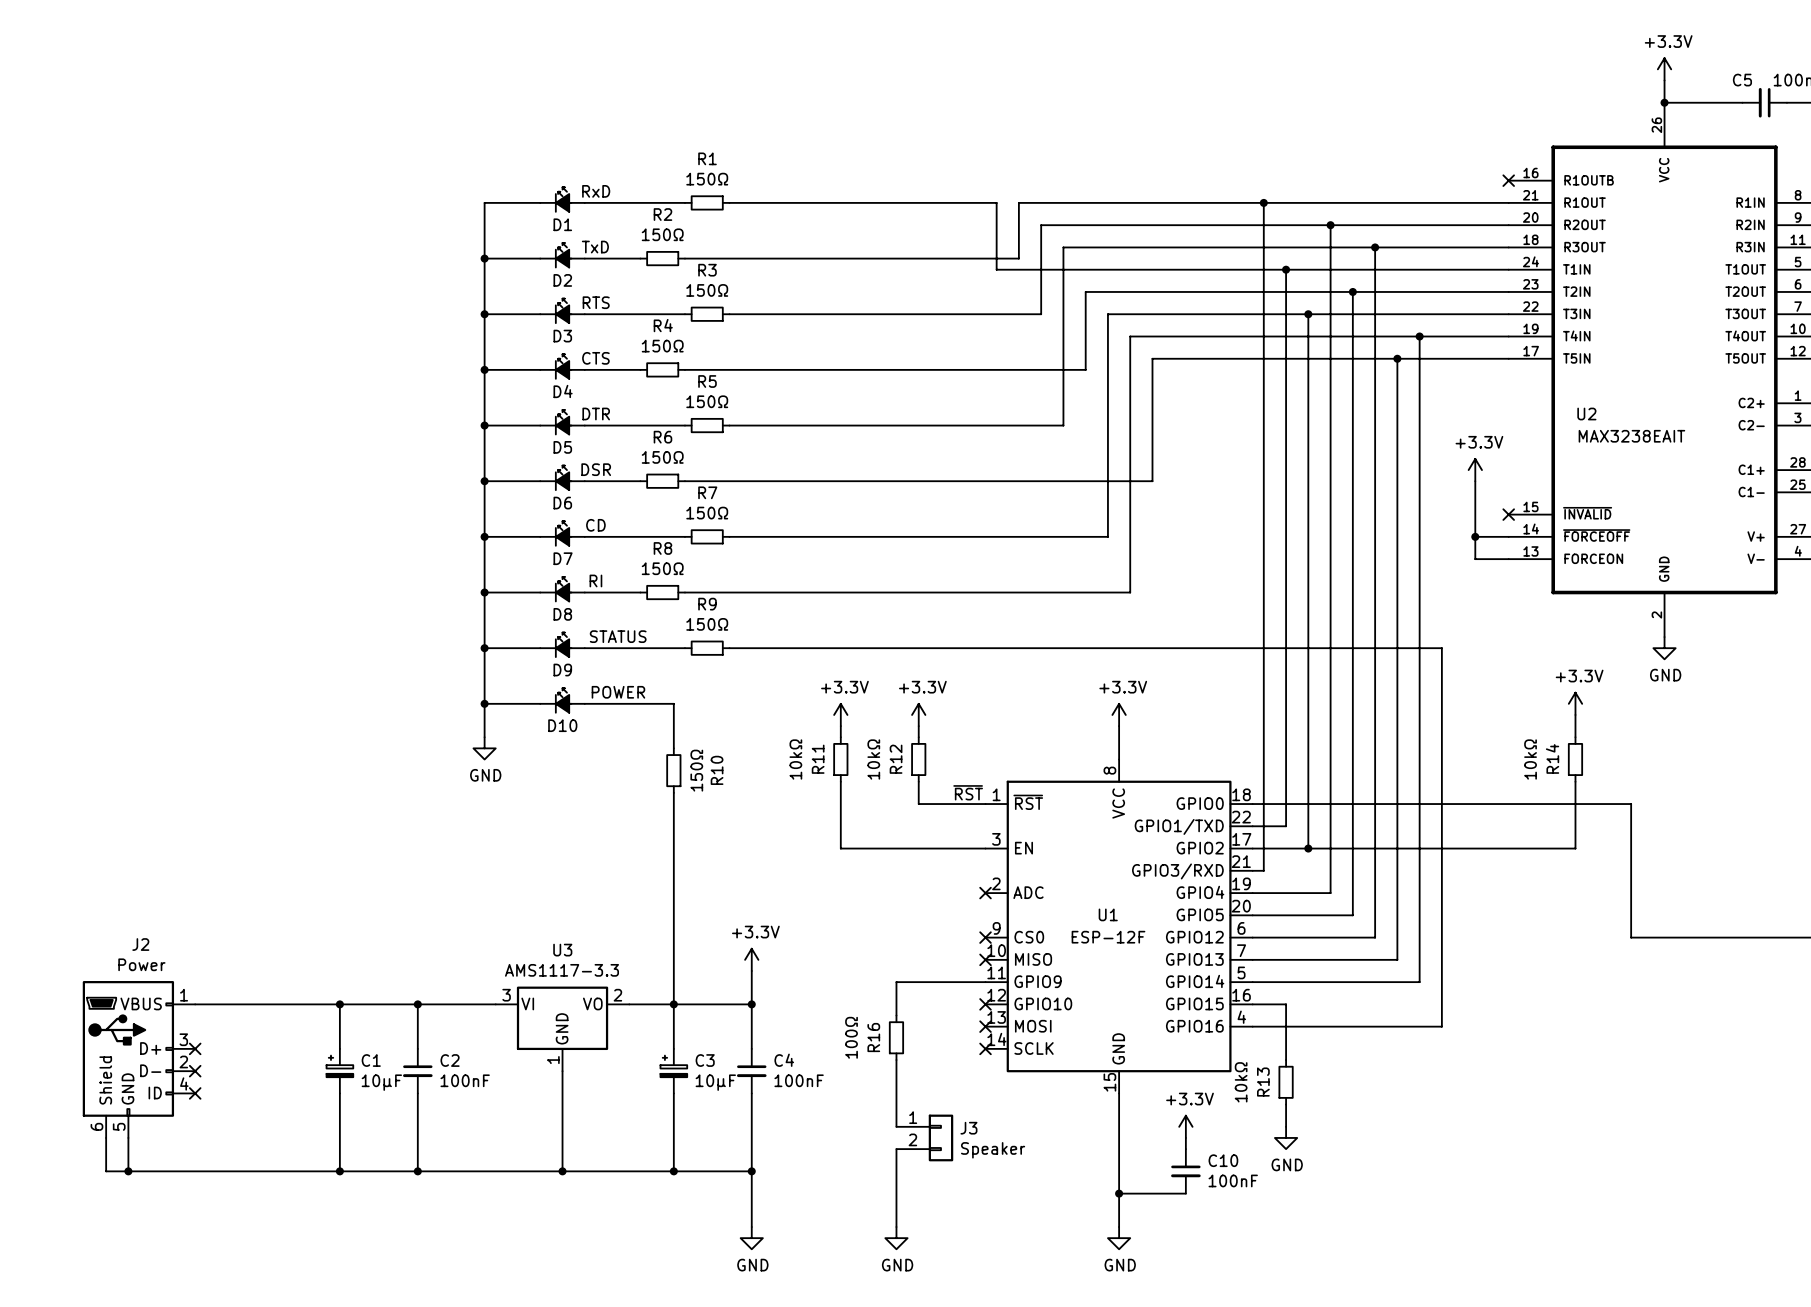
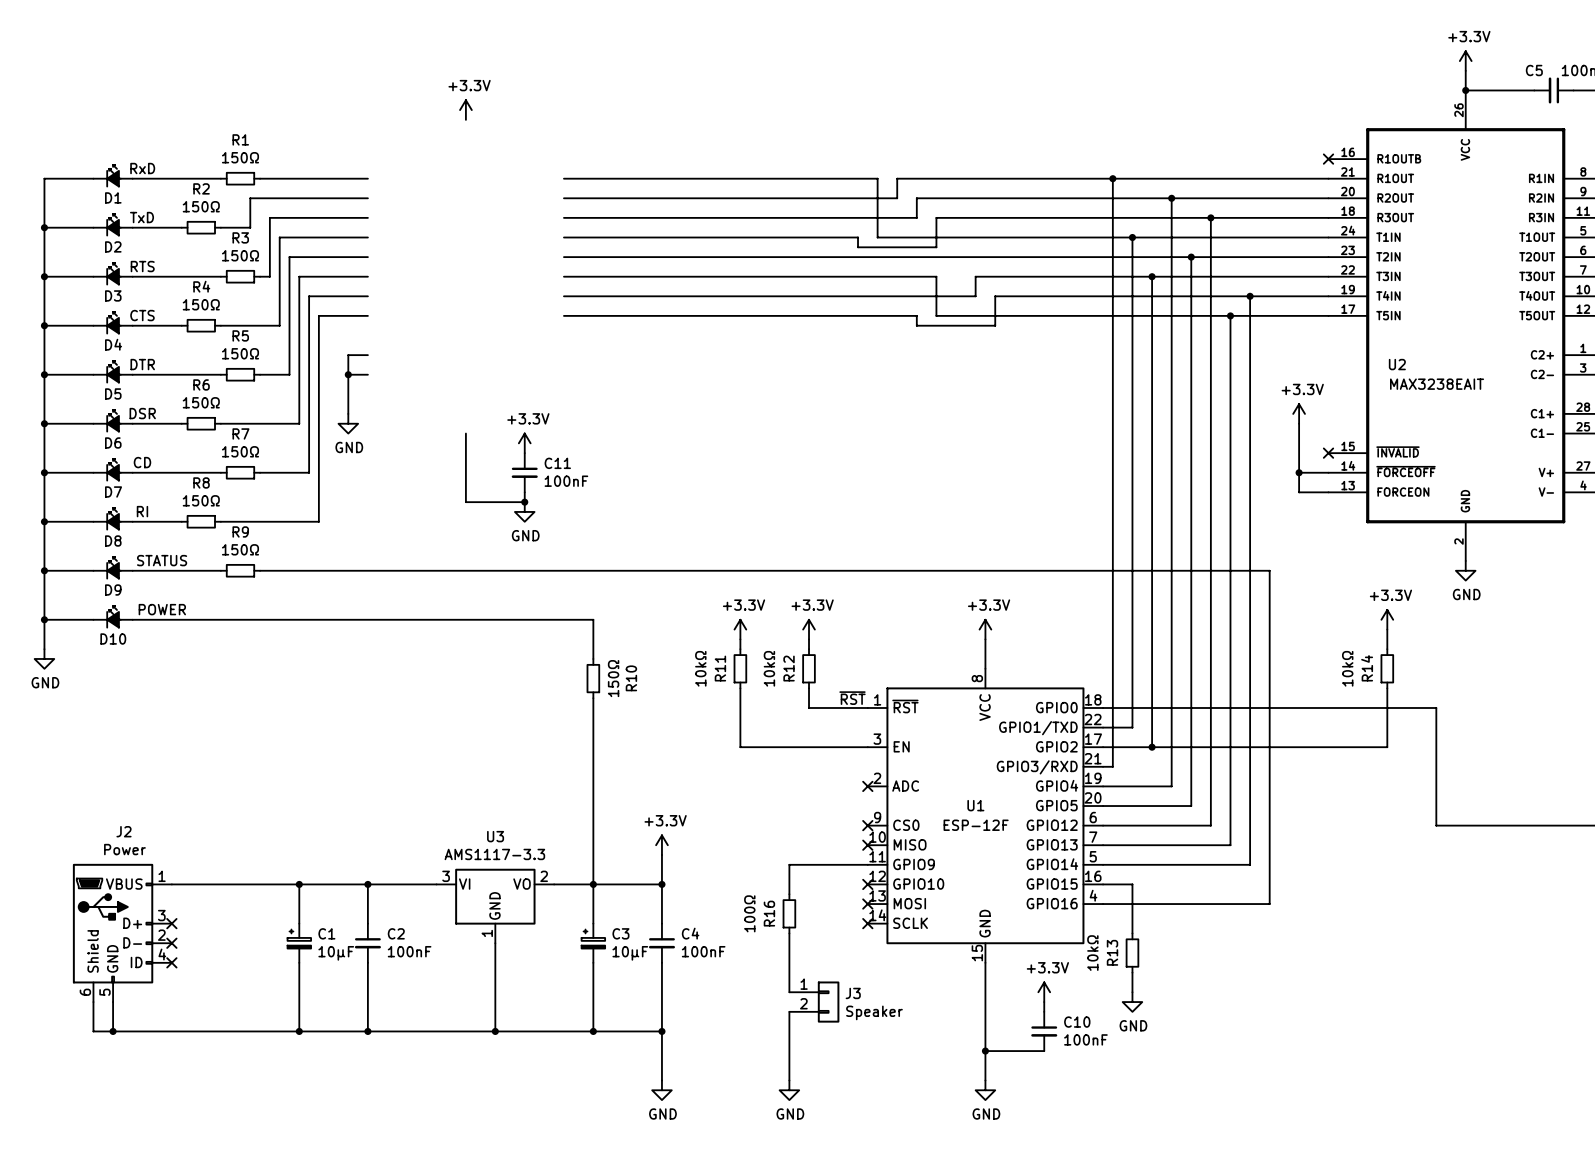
power symbol: none -> +3.3V (465, 110)
D1 position: (562, 199) -> (113, 175)
wire: none -> (93, 178) (44, 178) (44, 649)
wire: none -> (132, 178) (220, 178)
wire: none -> (260, 178) (367, 178)
wire: (540, 202) (484, 202) (484, 737) -> none
wire: (584, 202) (640, 202) -> none
wire: none -> (603, 178) (642, 178)
R1 position: (707, 202) -> (240, 178)
wire: none -> (367, 198) (250, 198) (250, 227) (220, 227)
wire: (1018, 225) (1018, 258) (684, 258) -> (897, 198) (563, 198)
wire: none -> (367, 217) (269, 217) (269, 276) (260, 276)
wire: (1041, 247) (1041, 314) -> (916, 217) (563, 217)
D2 position: (562, 255) -> (113, 224)
wire: none -> (44, 227) (93, 227)
junction: none -> (44, 227)
wire: none -> (132, 227) (181, 227)
wire: (484, 258) (540, 258) -> none
junction: (484, 258) -> none
wire: (584, 258) (640, 258) -> none
R2 position: (662, 258) -> (201, 227)
wire: none -> (367, 237) (279, 237) (279, 325) (220, 325)
wire: none -> (563, 237) (858, 237) (858, 247) (936, 247)
wire: (1063, 280) (1063, 314) -> (916, 276) (936, 276)
wire: none -> (367, 257) (289, 257) (289, 374) (260, 374)
wire: none -> (563, 257) (956, 257)
wire: (1085, 291) (1085, 369) -> (995, 325) (956, 325)
D3 position: (562, 310) -> (113, 273)
wire: none -> (44, 276) (93, 276)
junction: none -> (44, 276)
wire: none -> (132, 276) (220, 276)
wire: none -> (367, 276) (299, 276) (299, 423) (220, 423)
wire: (484, 314) (540, 314) -> none
junction: (484, 314) -> none
wire: (584, 314) (640, 314) -> none
wire: none -> (603, 276) (642, 276)
R3 position: (707, 314) -> (240, 276)
wire: none -> (367, 296) (309, 296) (309, 472) (260, 472)
wire: (1107, 336) (1107, 536) (729, 536) -> (975, 296) (563, 296)
wire: none -> (367, 315) (318, 315) (318, 521) (220, 521)
wire: (1063, 358) (1063, 425) (729, 425) -> none
wire: (1152, 358) (1152, 481) (684, 481) -> (1014, 315) (936, 315)
D4 position: (562, 366) -> (113, 322)
wire: none -> (44, 325) (93, 325)
junction: none -> (44, 325)
wire: none -> (132, 325) (181, 325)
wire: (484, 369) (540, 369) -> none
junction: (484, 369) -> none
wire: (584, 369) (640, 369) -> none
R4 position: (662, 369) -> (201, 325)
wire: (684, 369) (1041, 369) -> (563, 315) (916, 315) (916, 325)
wire: (1130, 369) (1130, 592) (684, 592) -> none
wire: none -> (367, 355) (348, 355) (348, 413)
D5 position: (562, 422) -> (113, 371)
wire: none -> (44, 374) (93, 374)
junction: none -> (44, 374)
wire: none -> (132, 374) (220, 374)
wire: none -> (348, 374) (367, 374)
junction: none -> (348, 374)
wire: (484, 425) (540, 425) -> none
junction: (484, 425) -> none
wire: (584, 425) (684, 425) -> none
R5 position: (707, 425) -> (240, 374)
D6 position: (562, 477) -> (113, 420)
wire: none -> (44, 423) (93, 423)
junction: none -> (44, 423)
wire: none -> (132, 423) (181, 423)
power symbol: none -> GND (348, 423)
wire: (484, 481) (540, 481) -> none
junction: (484, 481) -> none
wire: (584, 481) (640, 481) -> none
R6 position: (662, 481) -> (201, 423)
wire: none -> (465, 433) (465, 502) (524, 502) (524, 492)
power symbol: none -> +3.3V (524, 443)
D7 position: (562, 533) -> (113, 469)
wire: none -> (44, 472) (93, 472)
junction: none -> (44, 472)
wire: none -> (132, 472) (220, 472)
wire: (484, 536) (540, 536) -> none
junction: (484, 536) -> none
wire: (584, 536) (684, 536) -> none
C11: none -> 100nF (524, 472)
R7 position: (707, 536) -> (240, 472)
junction: none -> (524, 502)
power symbol: none -> GND (524, 511)
D8 position: (562, 589) -> (113, 518)
wire: none -> (44, 521) (93, 521)
junction: none -> (44, 521)
wire: none -> (132, 521) (181, 521)
wire: (484, 592) (540, 592) -> none
junction: (484, 592) -> none
wire: (584, 592) (640, 592) -> none
R8 position: (662, 592) -> (201, 521)
D9 position: (562, 644) -> (113, 567)
wire: none -> (44, 570) (93, 570)
junction: none -> (44, 570)
wire: none -> (132, 570) (220, 570)
wire: none -> (260, 570) (426, 570)
junction: (484, 648) -> none
wire: none -> (603, 570) (642, 570)
R9 position: (707, 648) -> (240, 570)
D10 position: (562, 700) -> (113, 616)
wire: none -> (44, 619) (93, 619)
junction: none -> (44, 619)
wire: none -> (132, 619) (426, 619)
junction: (484, 703) -> none
power symbol: none -> GND (44, 658)
power symbol: GND (484, 748) -> none

